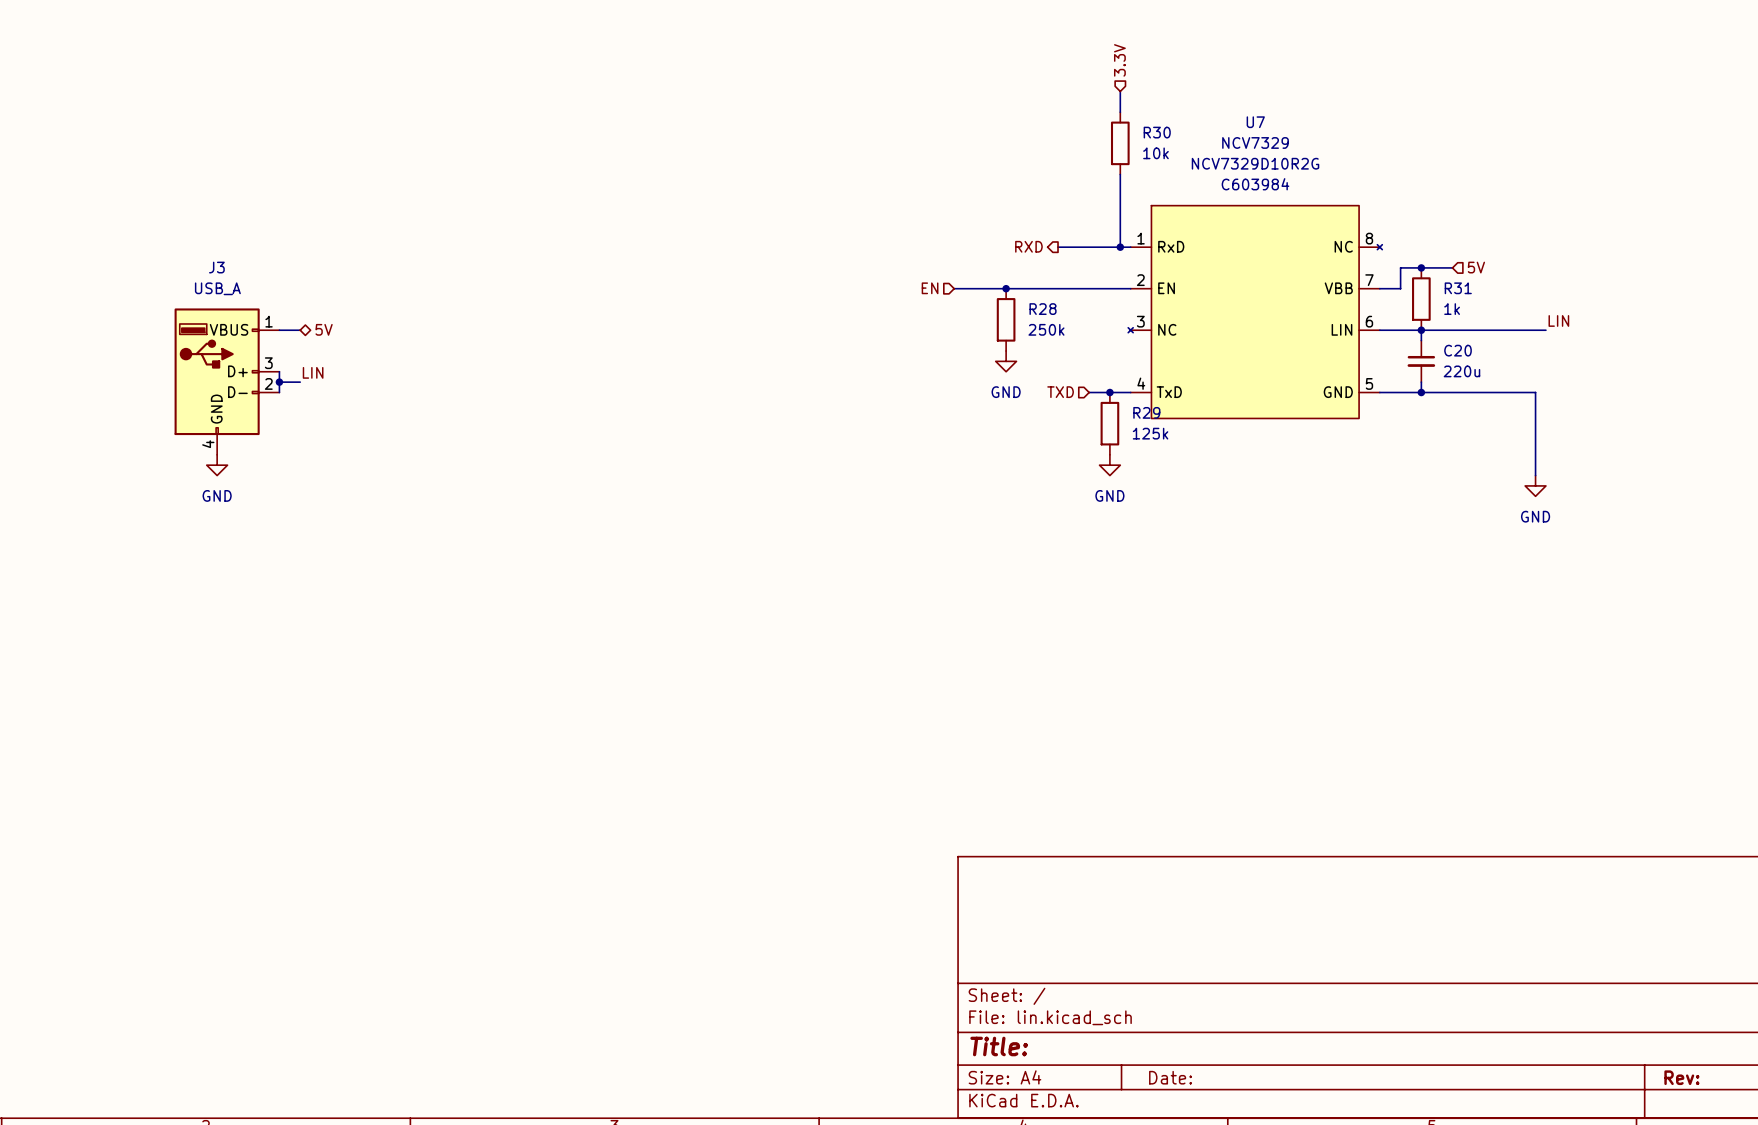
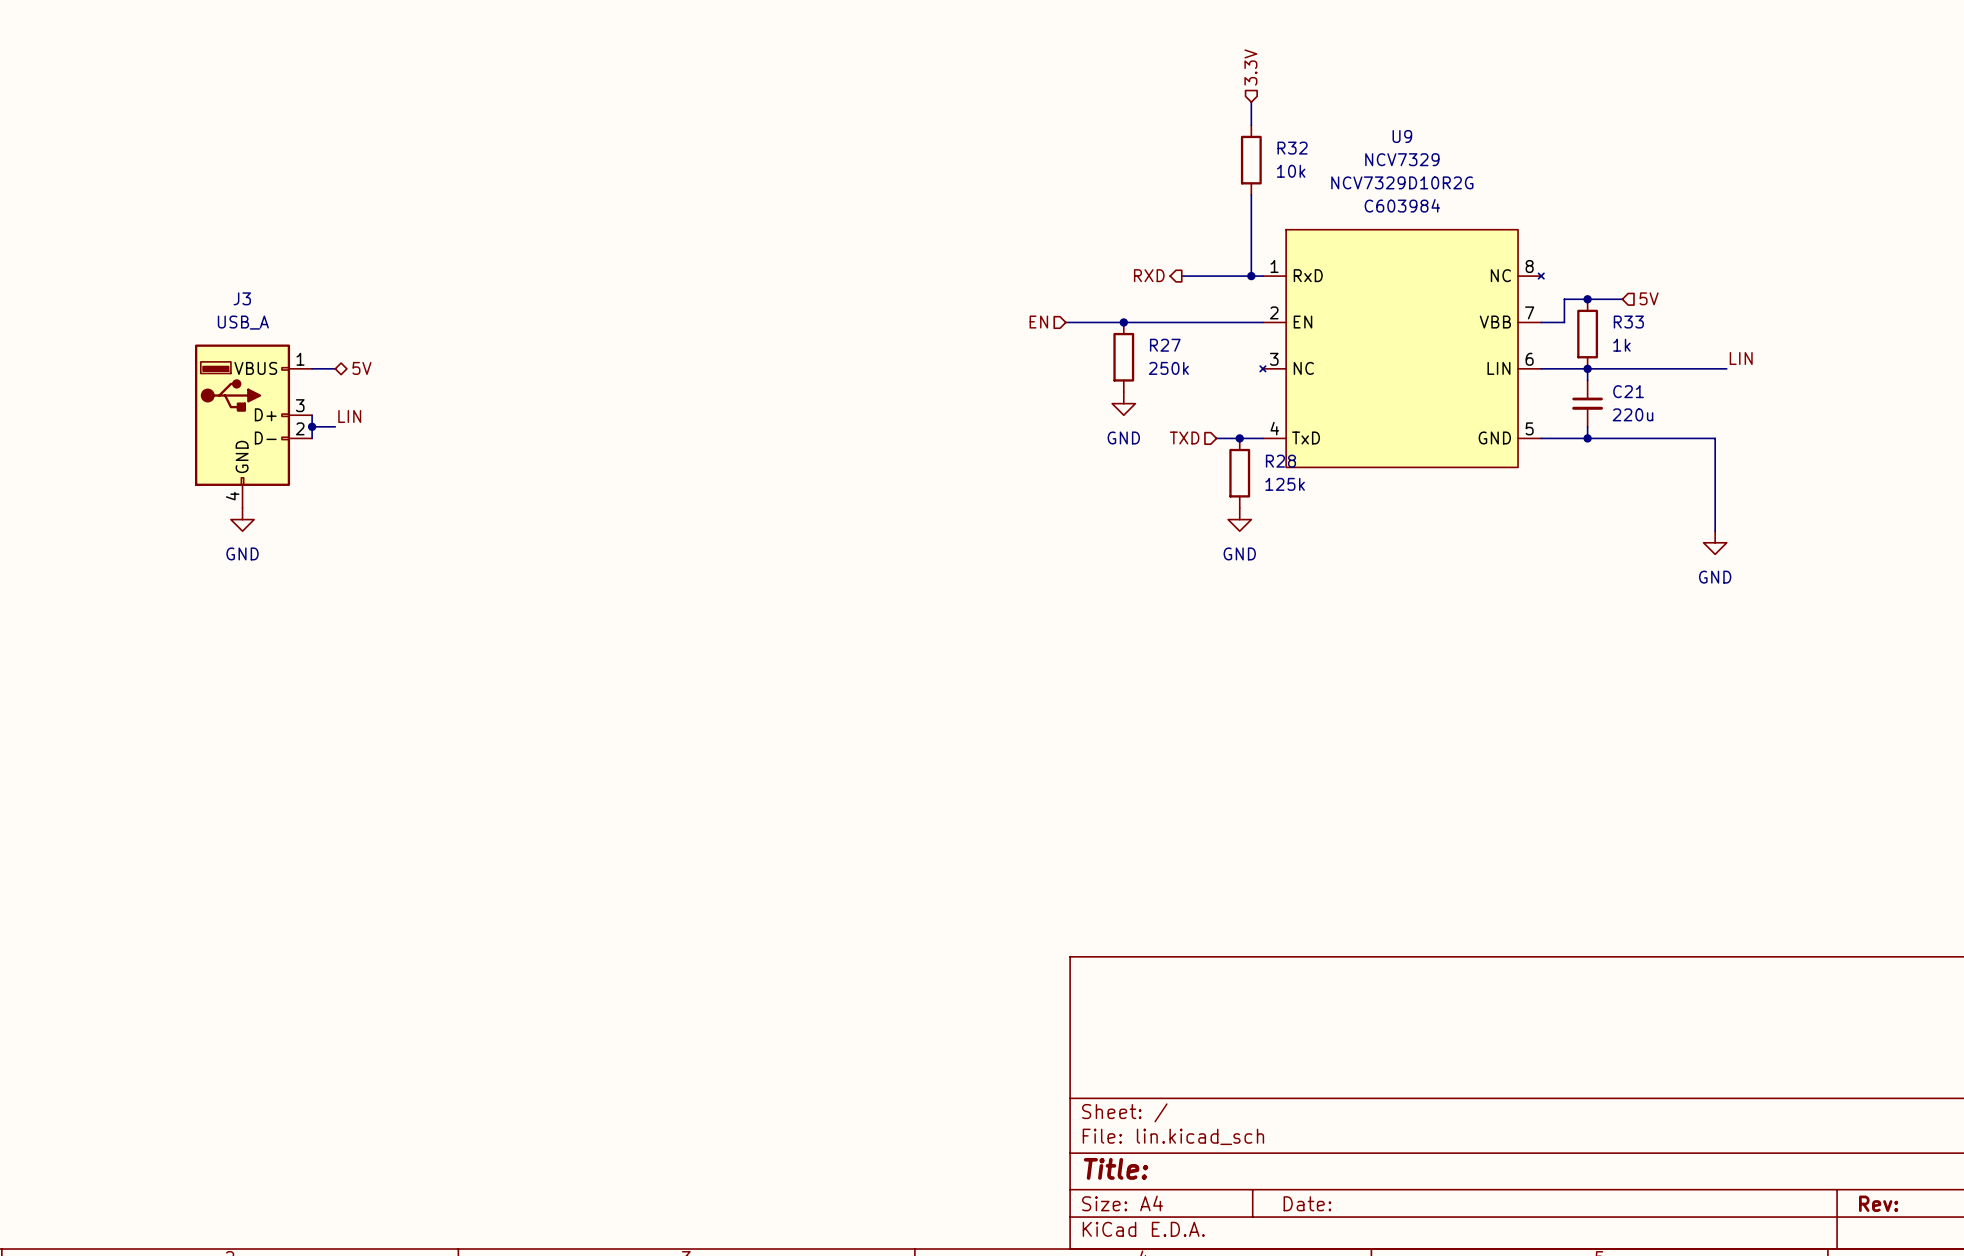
U7 name: U7 (1255, 122) -> U9 (1402, 136)
R30 name: R30 (1157, 132) -> R32 (1292, 148)
R31 name: R31 (1458, 288) -> R33 (1628, 322)
R28 name: R28 (1043, 309) -> R27 (1165, 345)
C20 name: C20 (1458, 350) -> C21 (1628, 391)
R29 name: R29 (1146, 412) -> R28 (1280, 461)

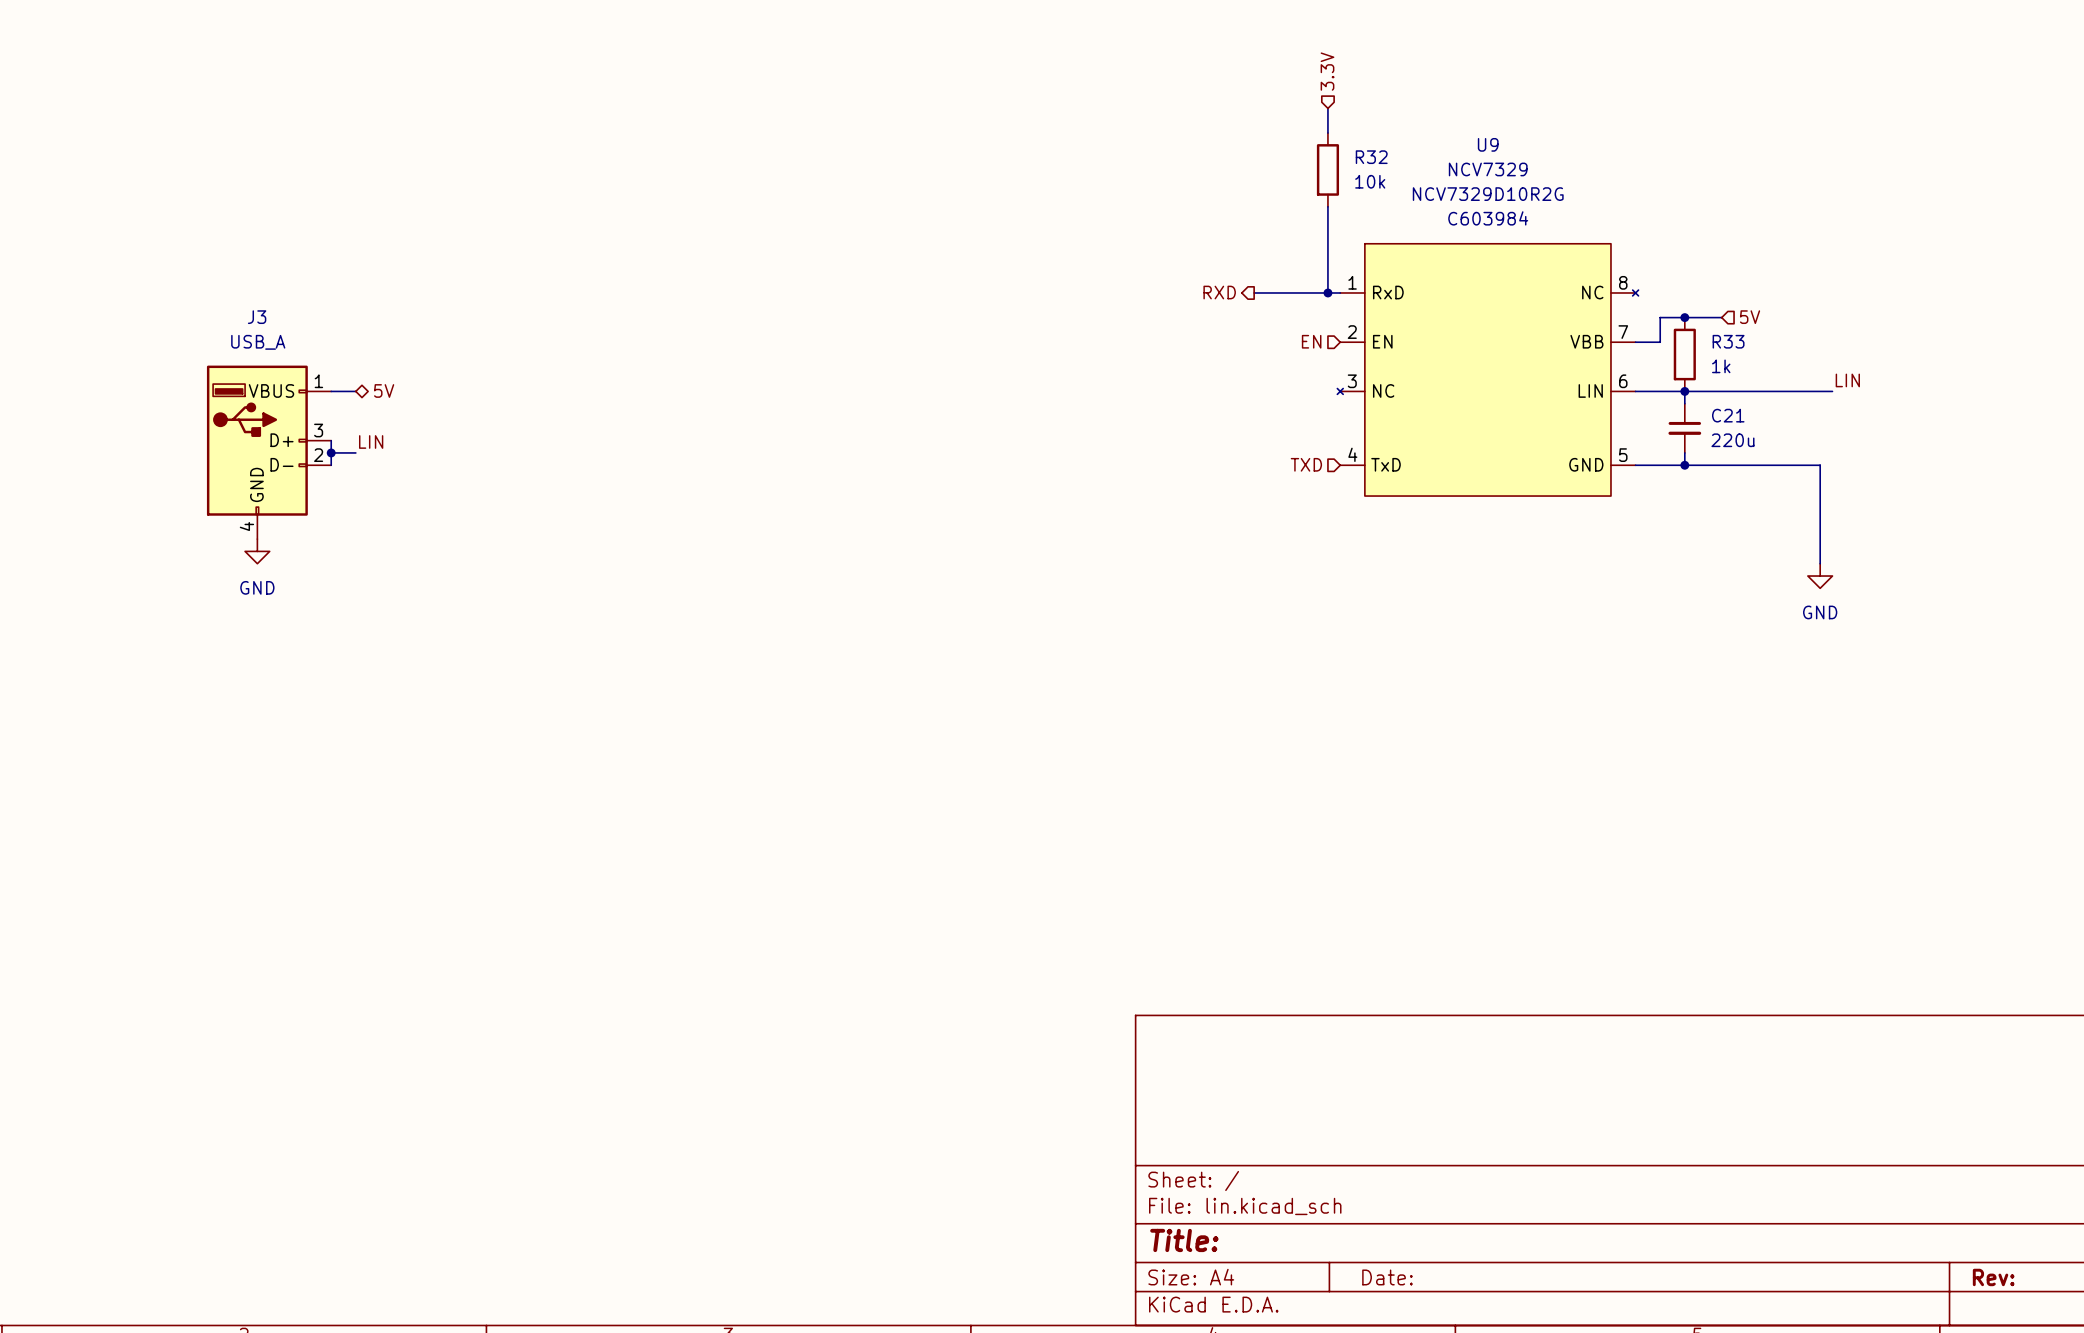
hierarchical label position: EN (1038, 322) -> EN (1311, 341)
wire: (1065, 322) (1262, 322) -> none
junction: (1123, 322) -> none
R27: 250k (1123, 357) -> none
power symbol: GND (1123, 403) -> none
hierarchical label position: TXD (1184, 437) -> TXD (1306, 464)
wire: (1216, 438) (1262, 438) -> none
junction: (1239, 438) -> none
R28: 125k (1239, 473) -> none
power symbol: GND (1239, 519) -> none

